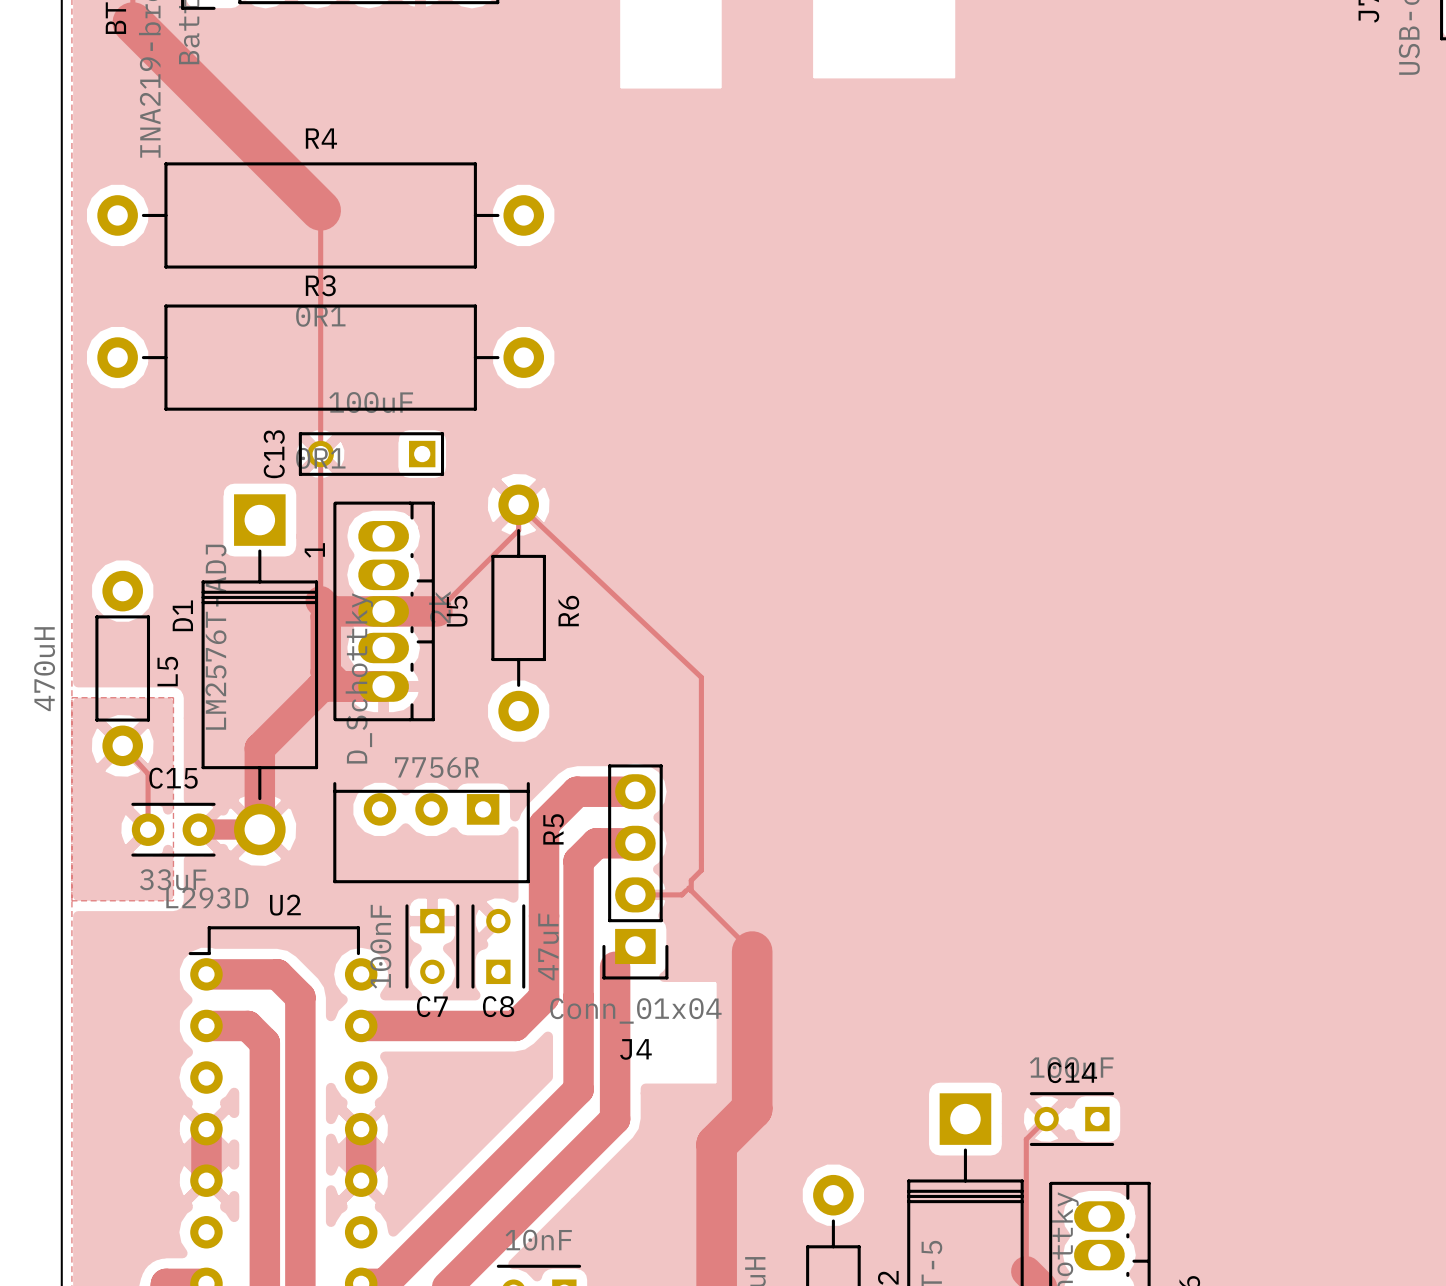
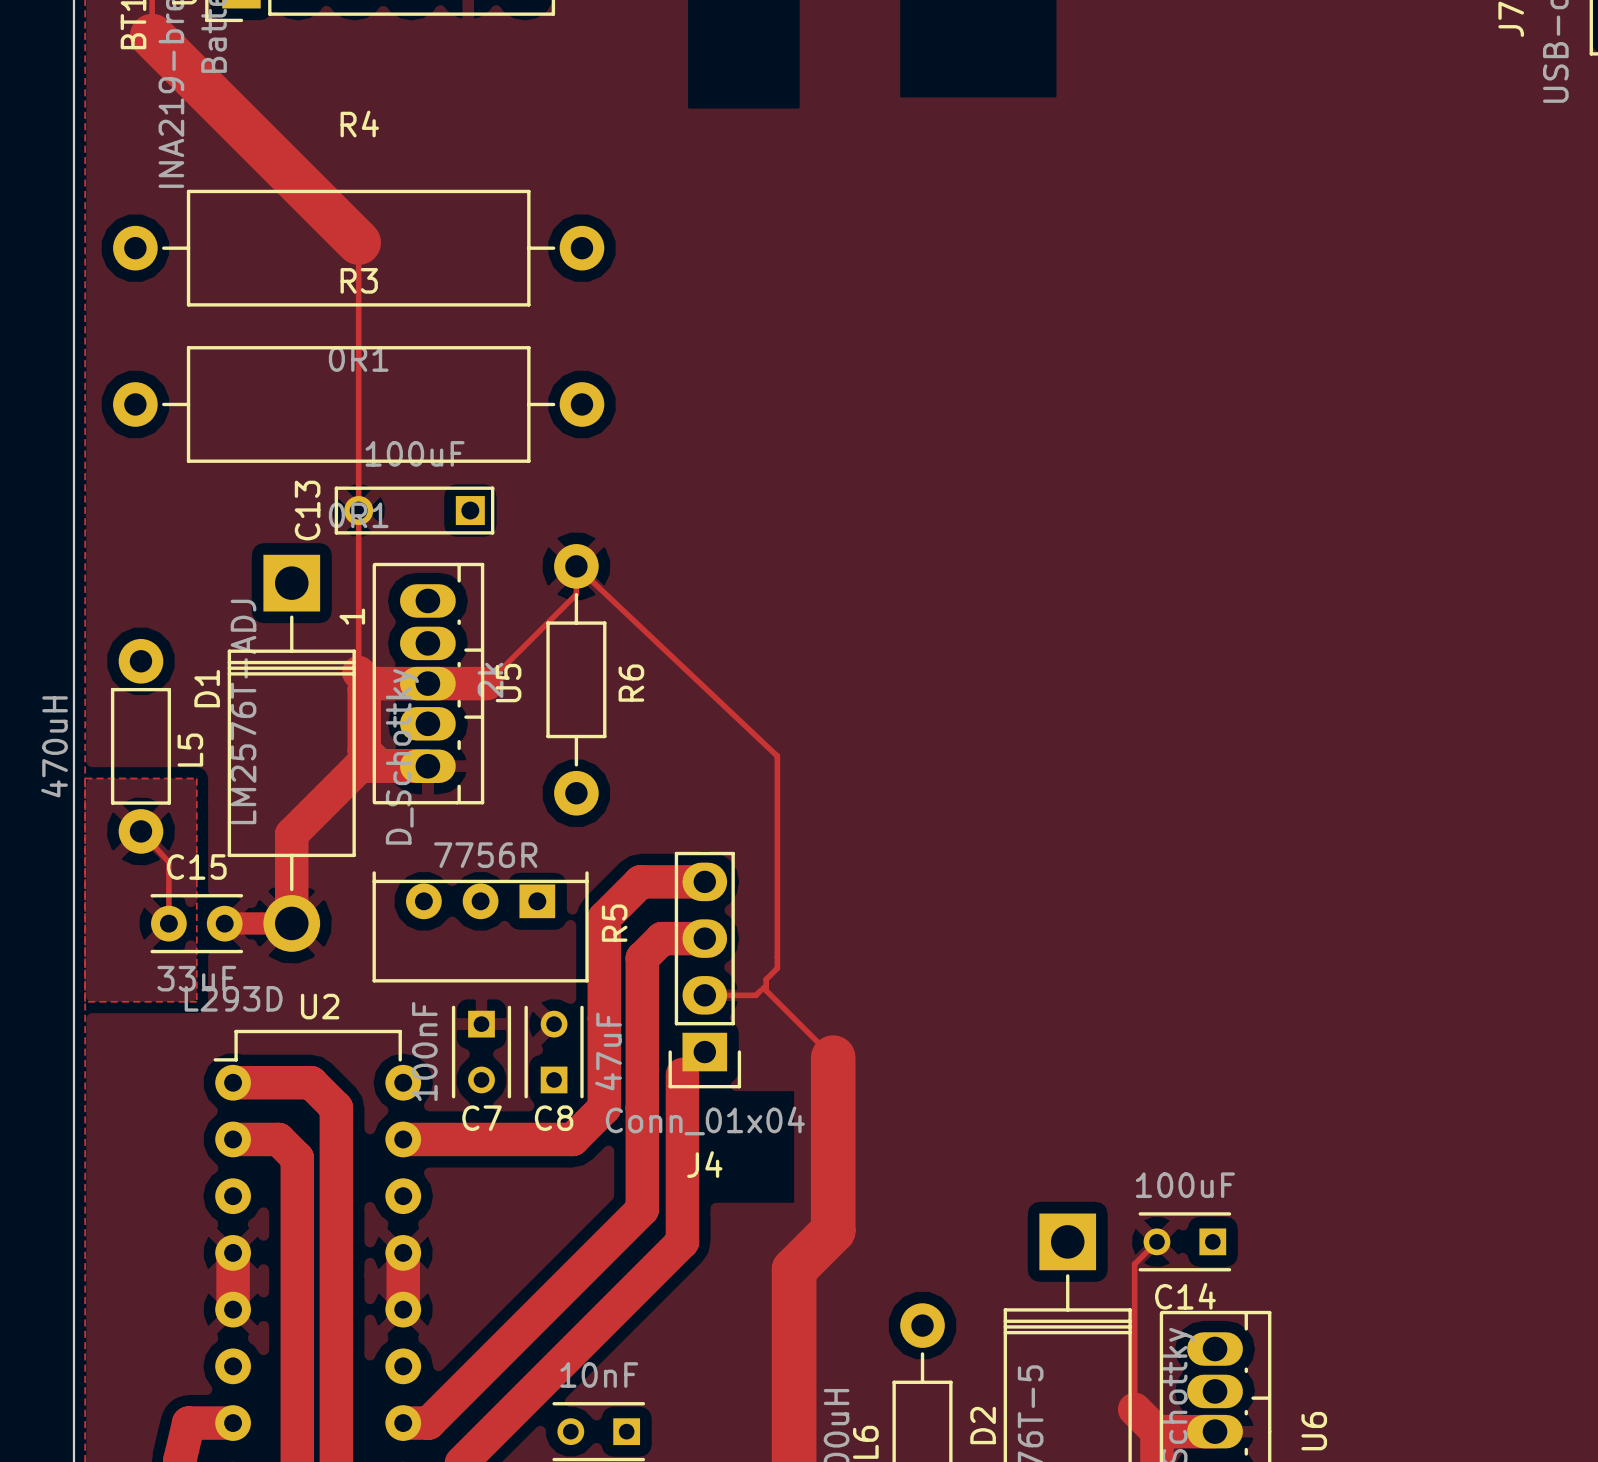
R4 name position: R4 (321, 138) -> R4 (359, 124)
R3 name position: R3 (320, 285) -> R3 (359, 280)
C14 name position: C14 (1072, 1072) -> C14 (1185, 1296)

